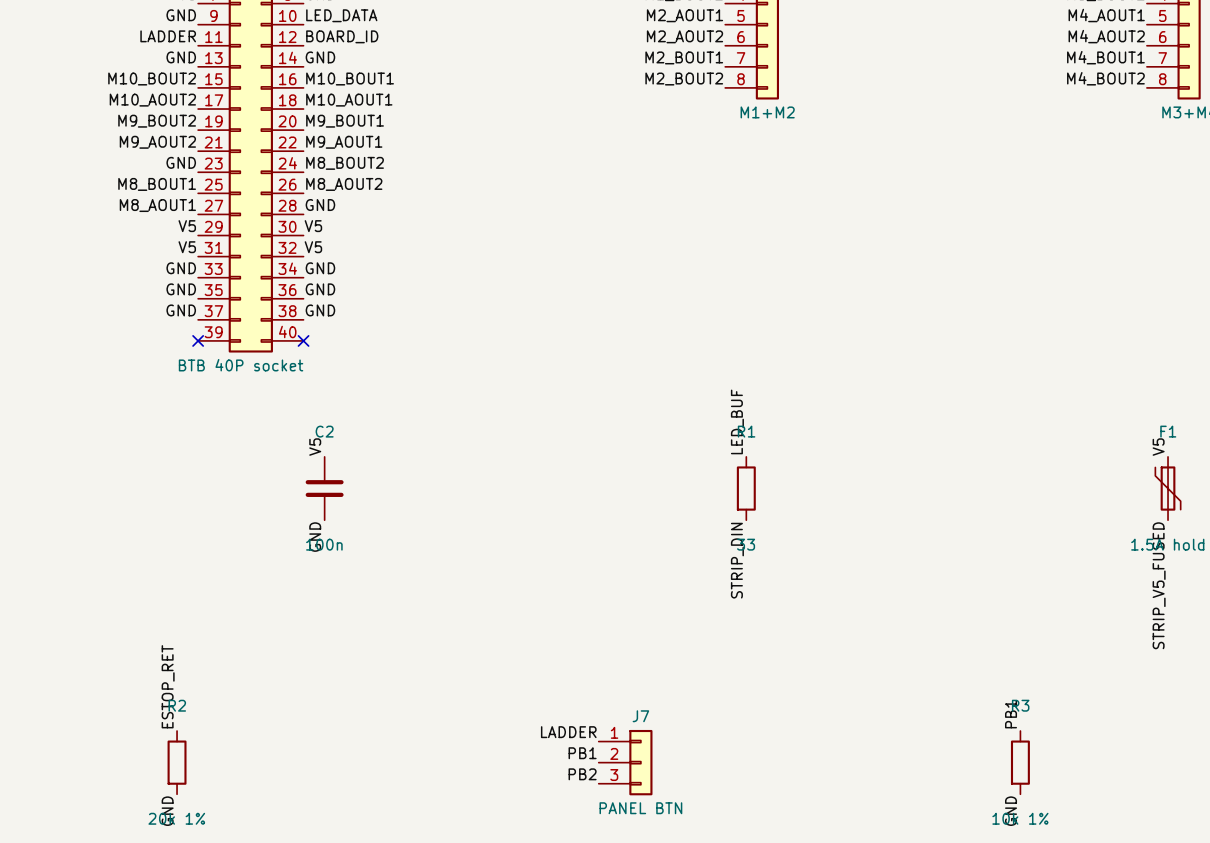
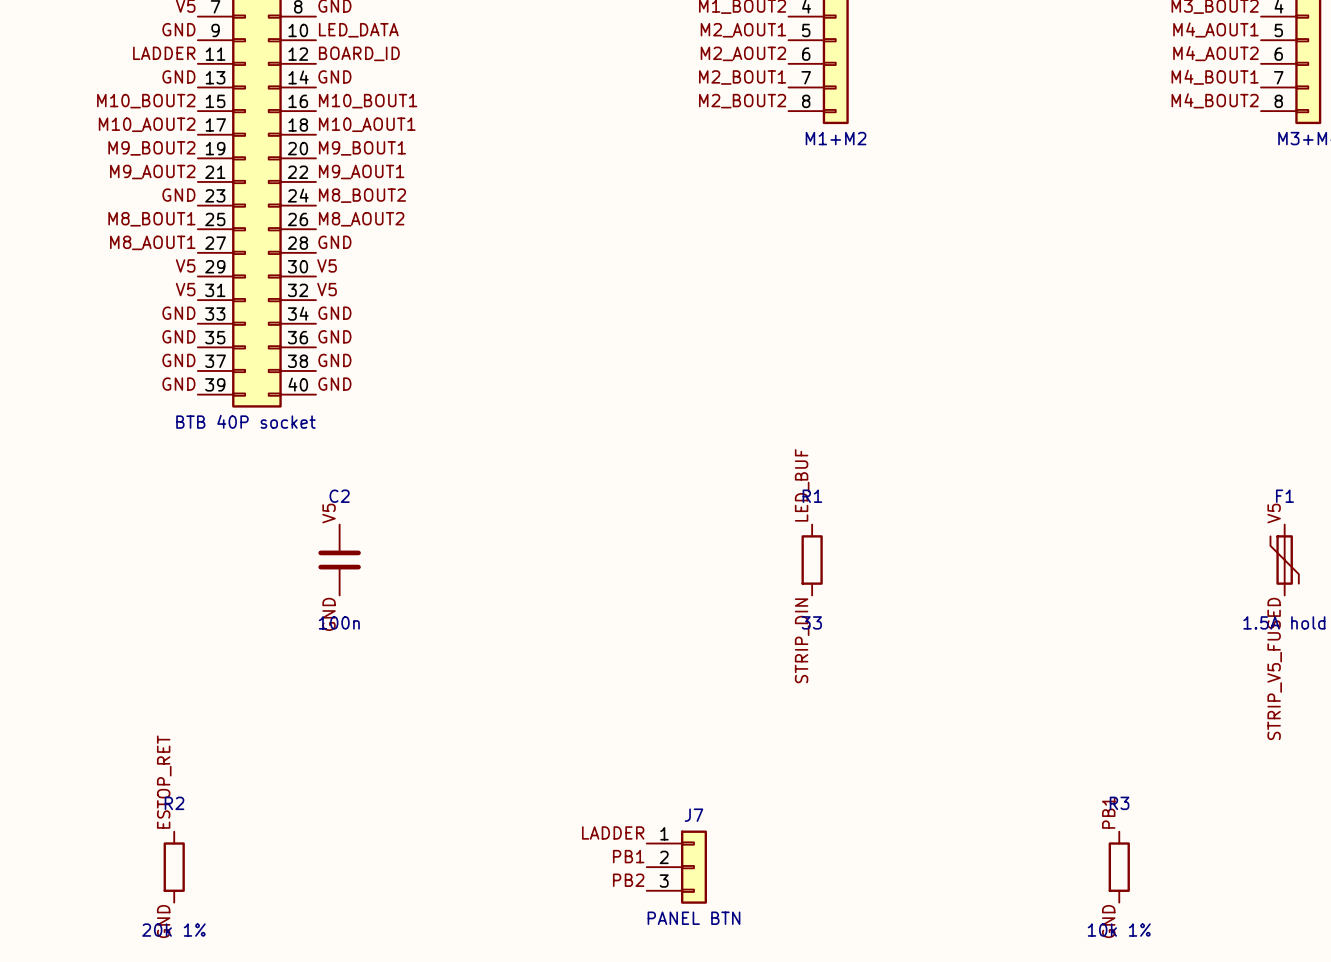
label: none -> GND (178, 384)
label: none -> GND (334, 384)
no-connect mark: (198, 340) -> none
no-connect mark: (303, 340) -> none

